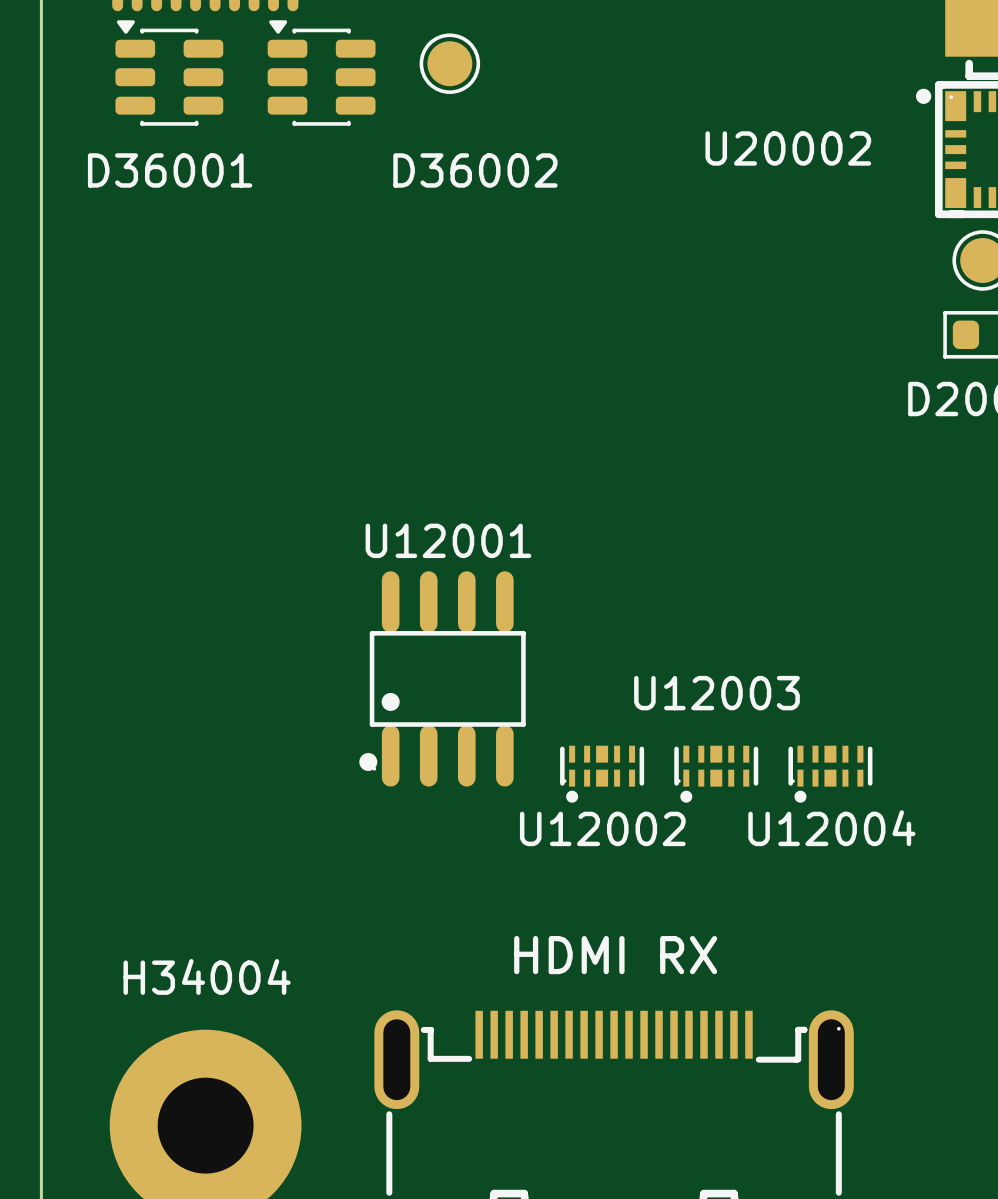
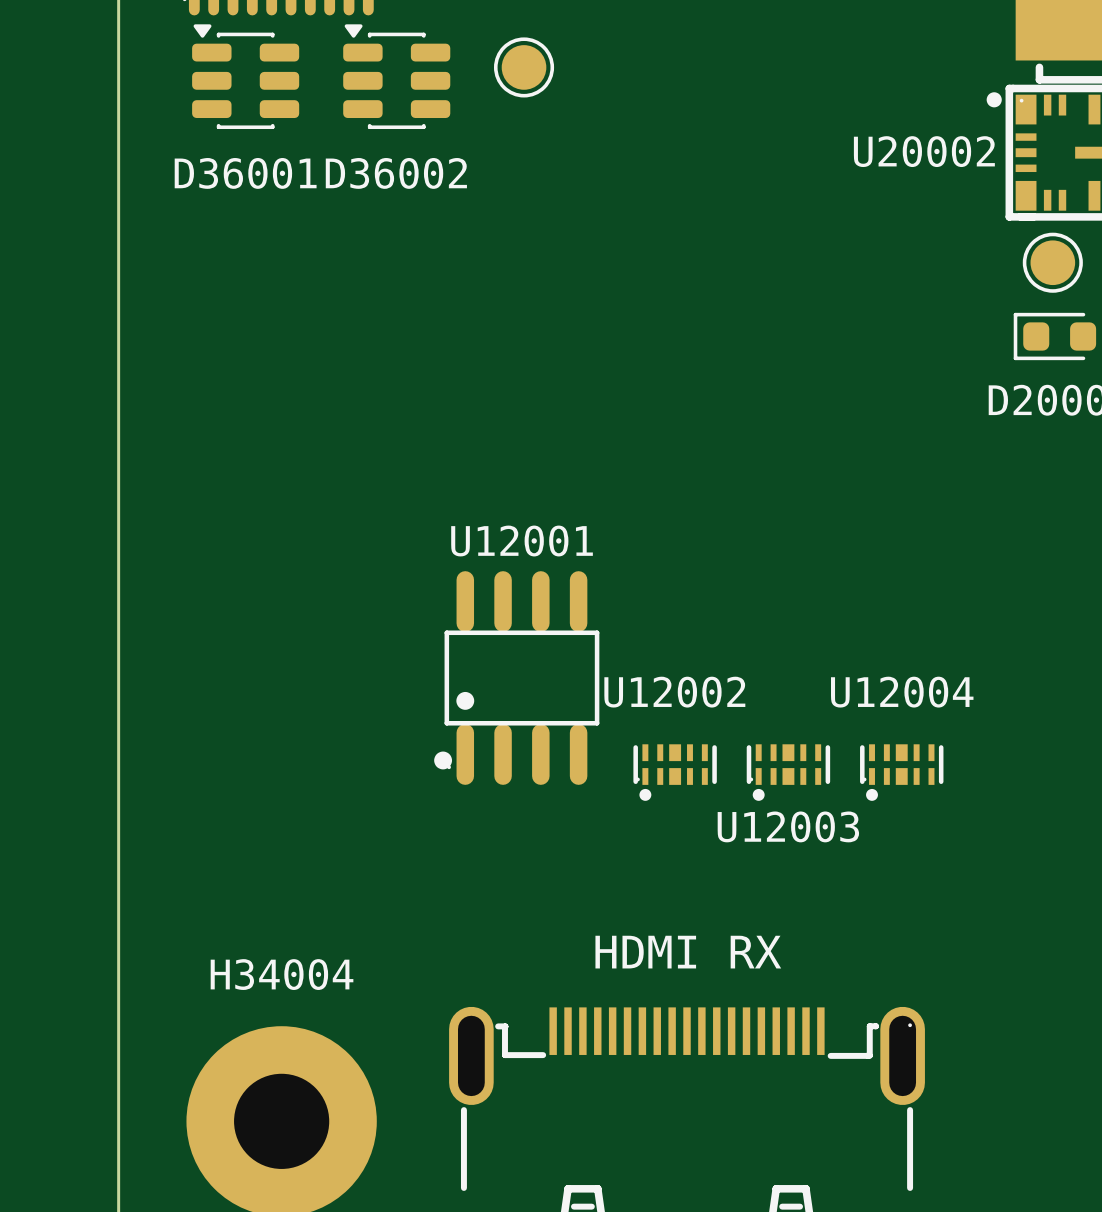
U20002 name position: U20002 (788, 148) -> U20002 (924, 151)
D36002 name position: D36002 (475, 170) -> D36002 (396, 173)
U12003 name position: U12003 (716, 693) -> U12003 (788, 826)
U12002 name position: U12002 (602, 828) -> U12002 (674, 692)
U12004 name position: U12004 (831, 828) -> U12004 (902, 692)

